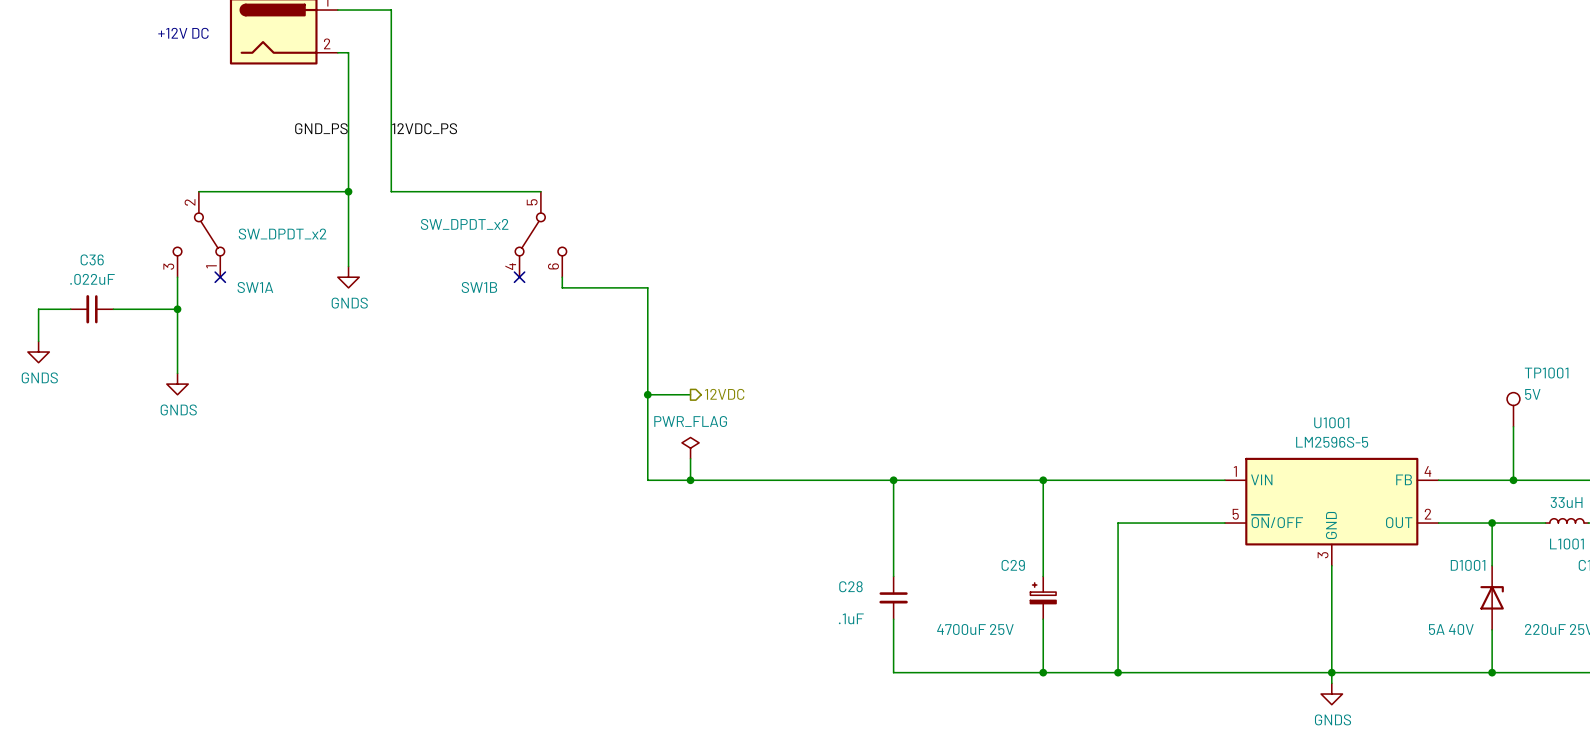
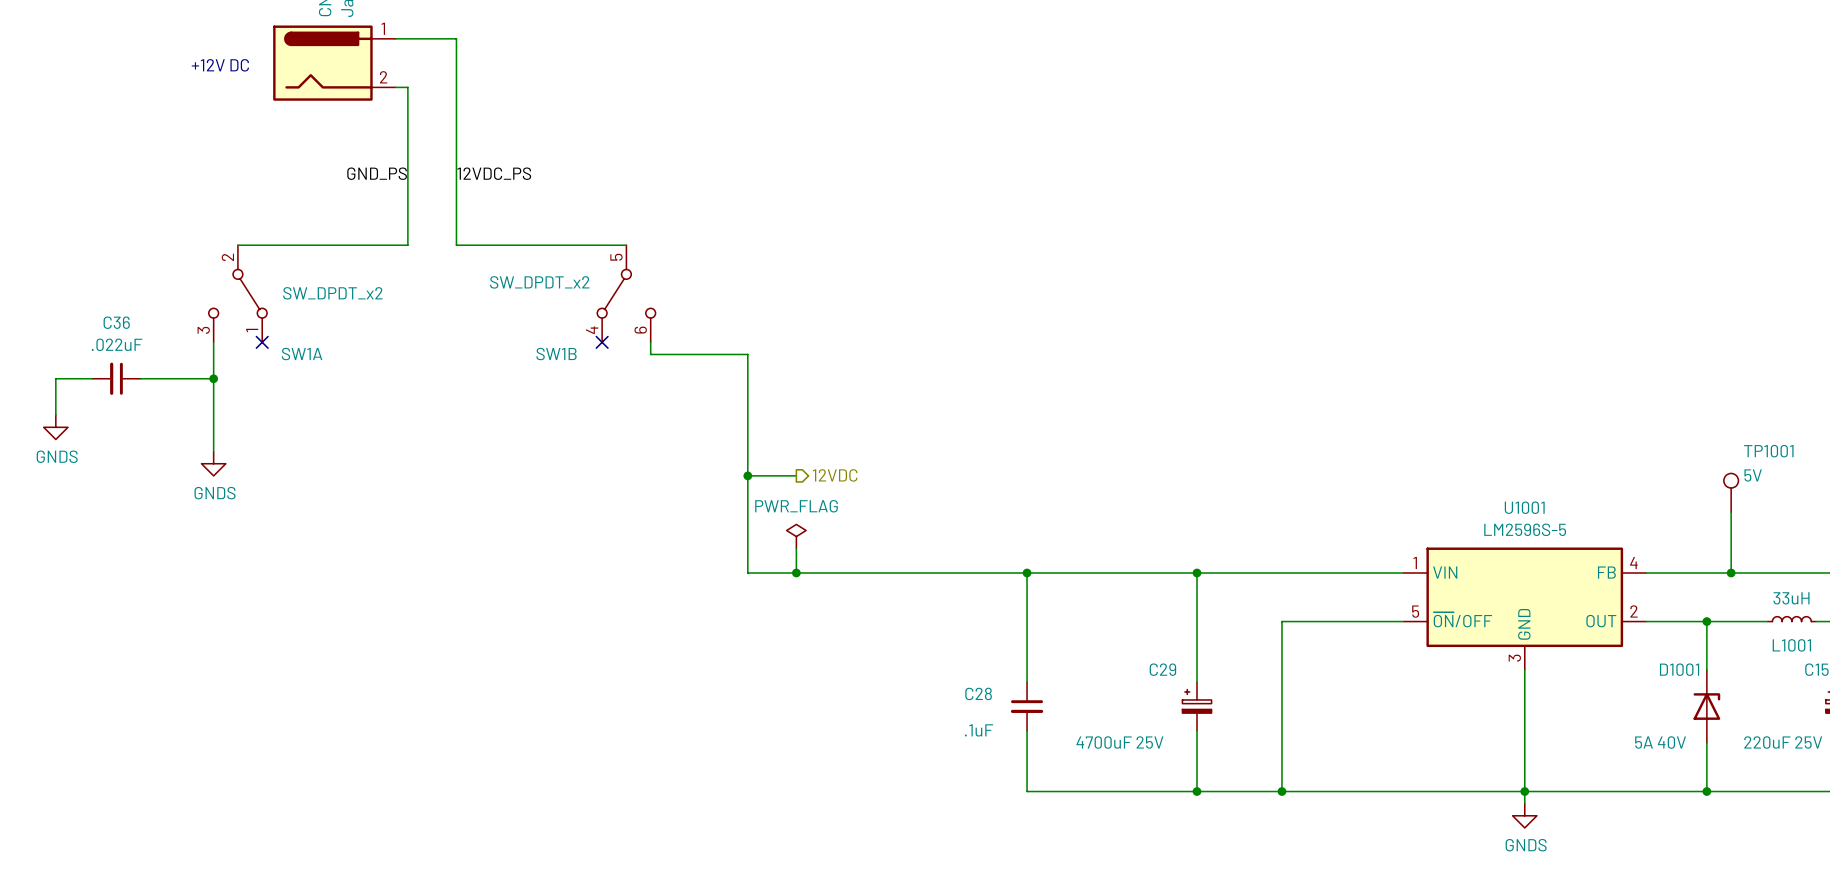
wire: (348, 191) (348, 266) -> none
junction: (348, 191) -> none
power symbol: GNDS (348, 277) -> none

